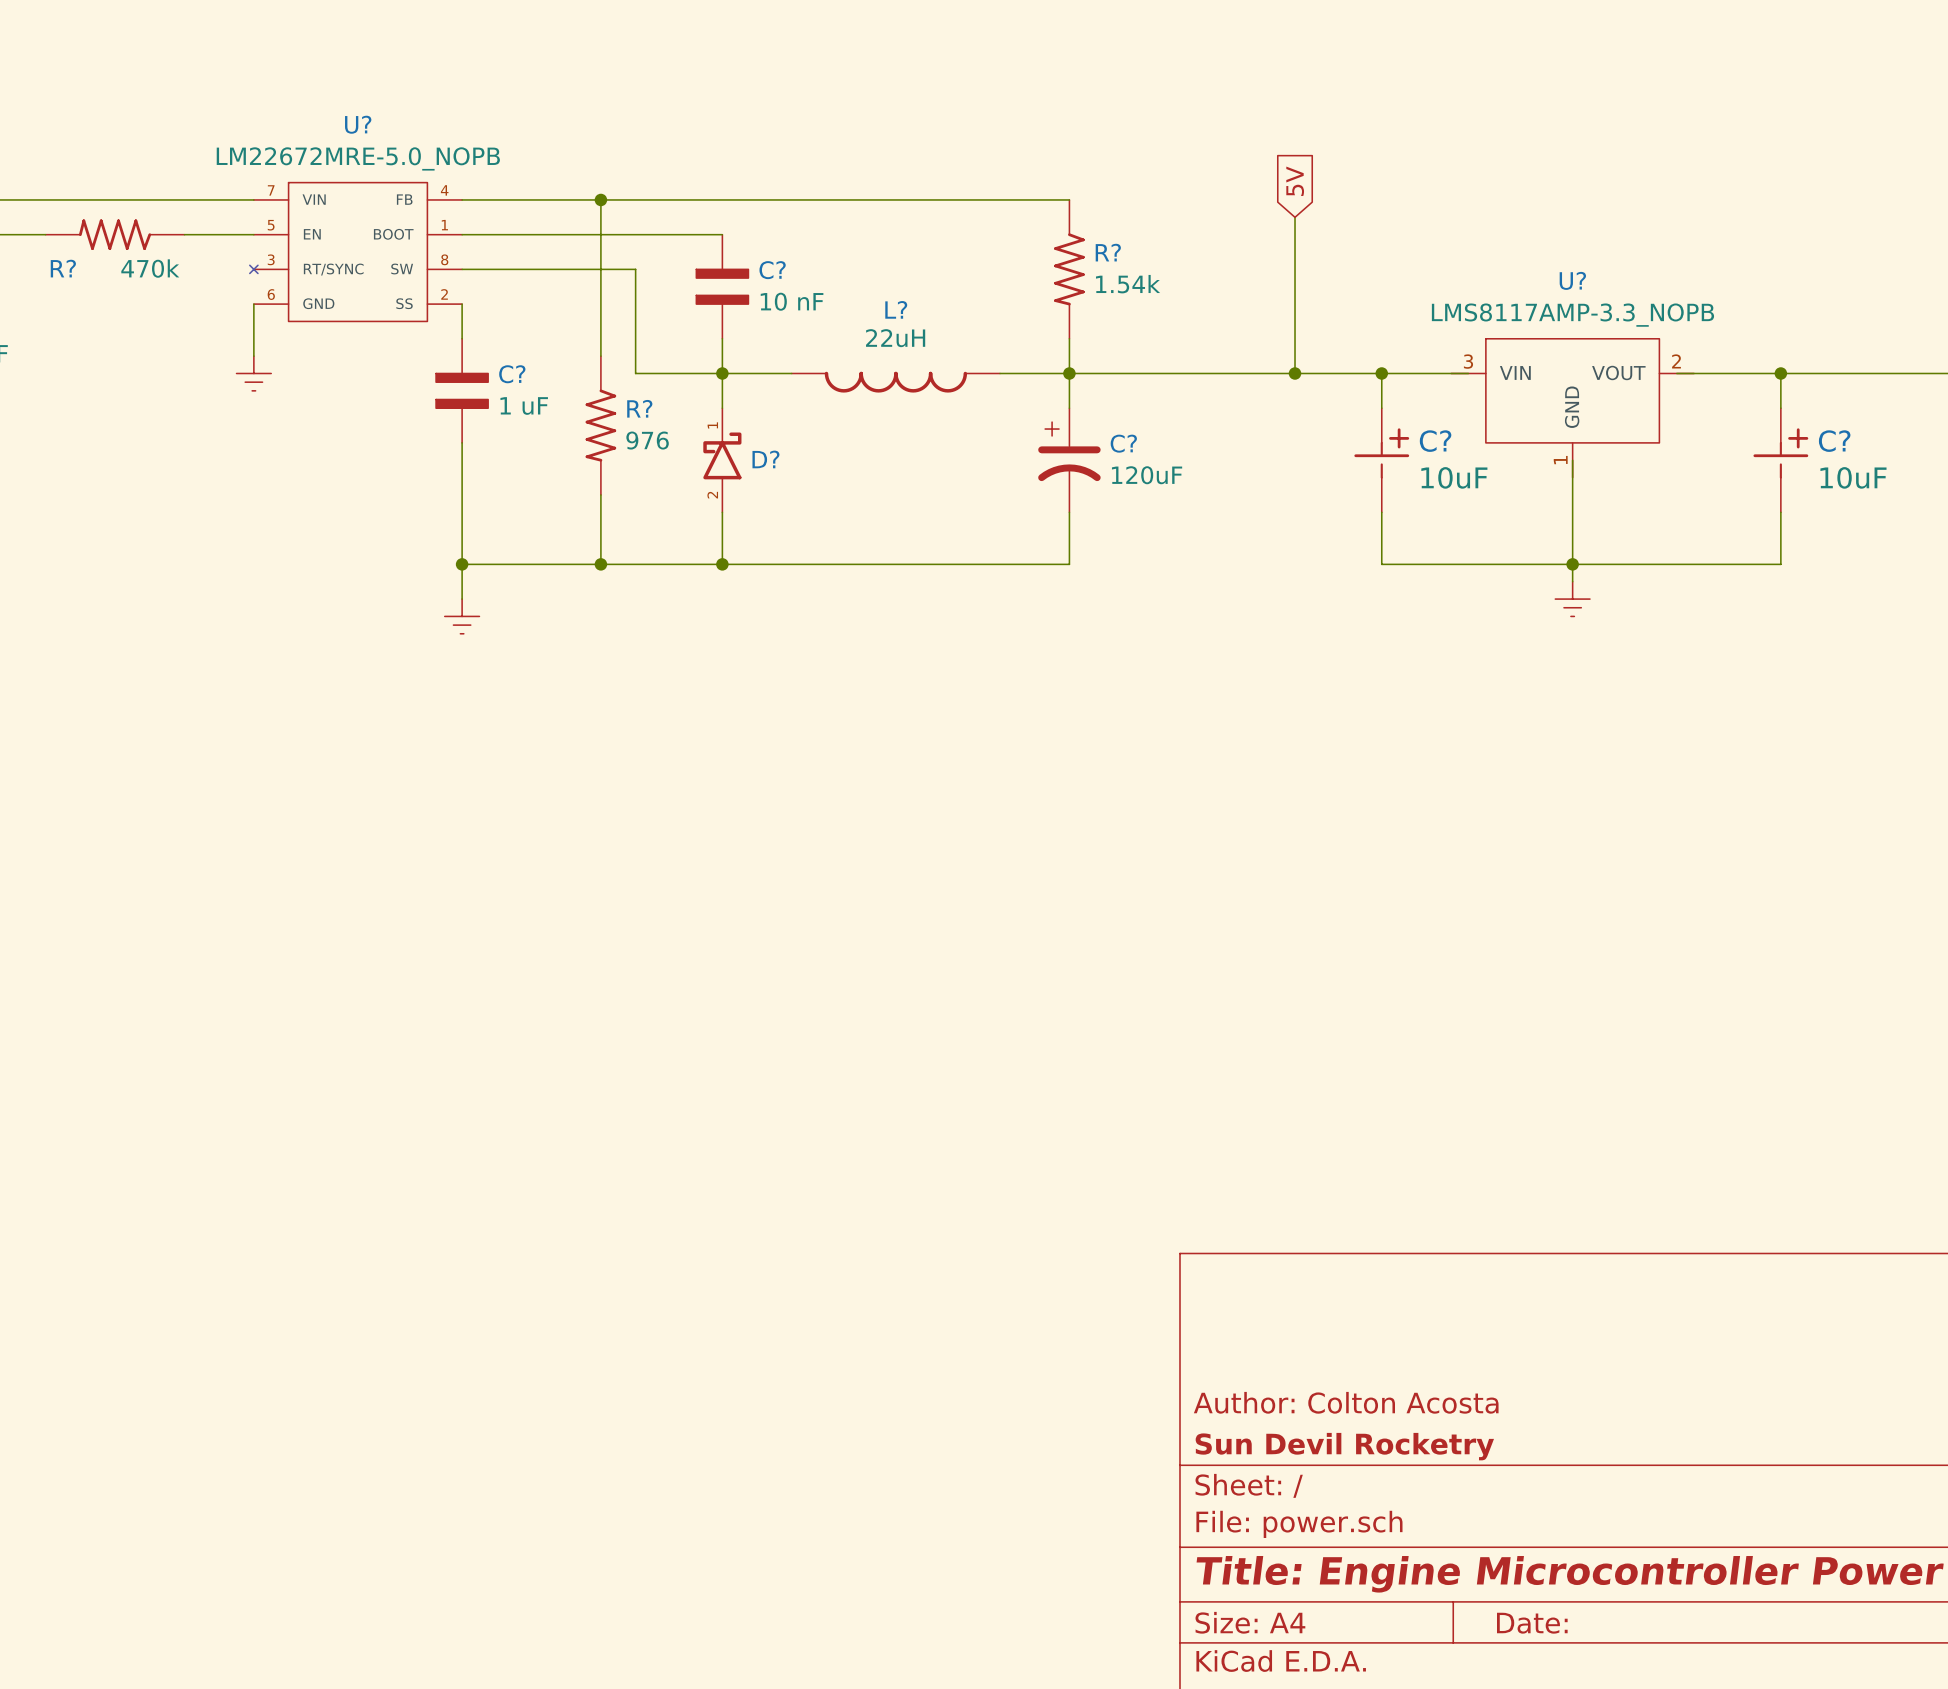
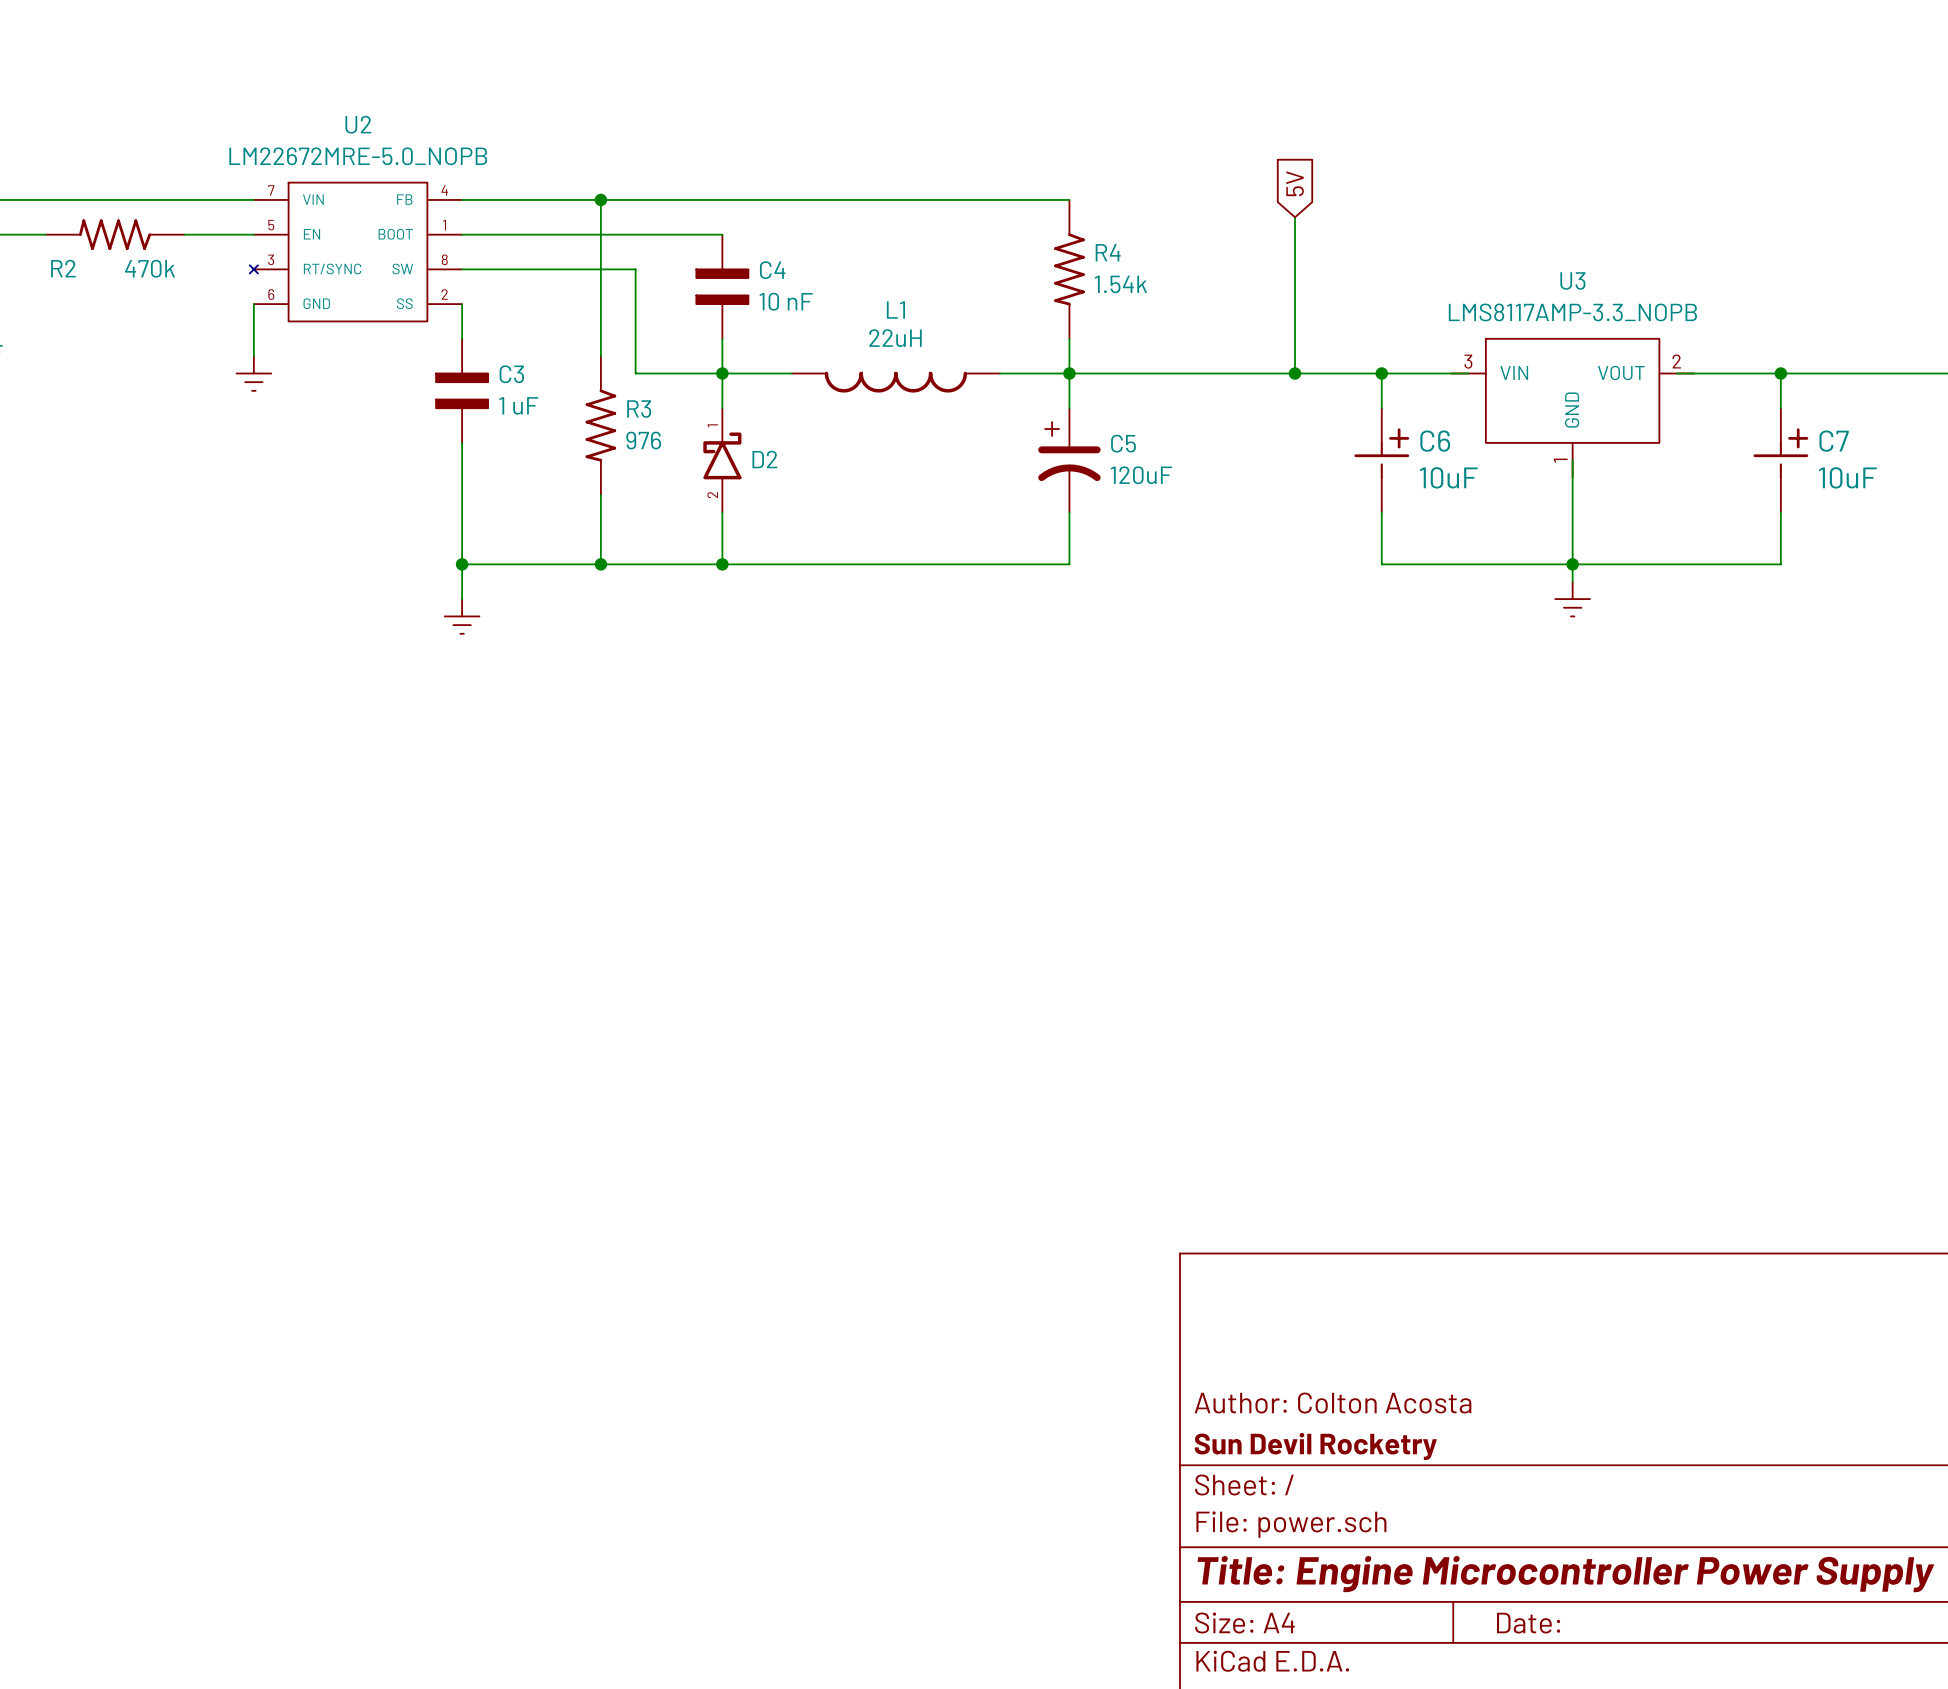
U? name: U? (358, 124) -> U2 (358, 124)
R? name: R? (1108, 252) -> R4 (1108, 252)
R? name: R? (63, 268) -> R2 (63, 268)
C? name: C? (772, 270) -> C4 (772, 270)
U? name: U? (1572, 280) -> U3 (1572, 280)
L? name: L? (896, 309) -> L1 (895, 310)
C? name: C? (512, 374) -> C3 (511, 374)
R? name: R? (639, 408) -> R3 (639, 409)
C? name: C? (1435, 441) -> C6 (1435, 441)
C? name: C? (1834, 441) -> C7 (1834, 441)
C? name: C? (1123, 443) -> C5 (1123, 443)
D? name: D? (765, 459) -> D2 (764, 459)

